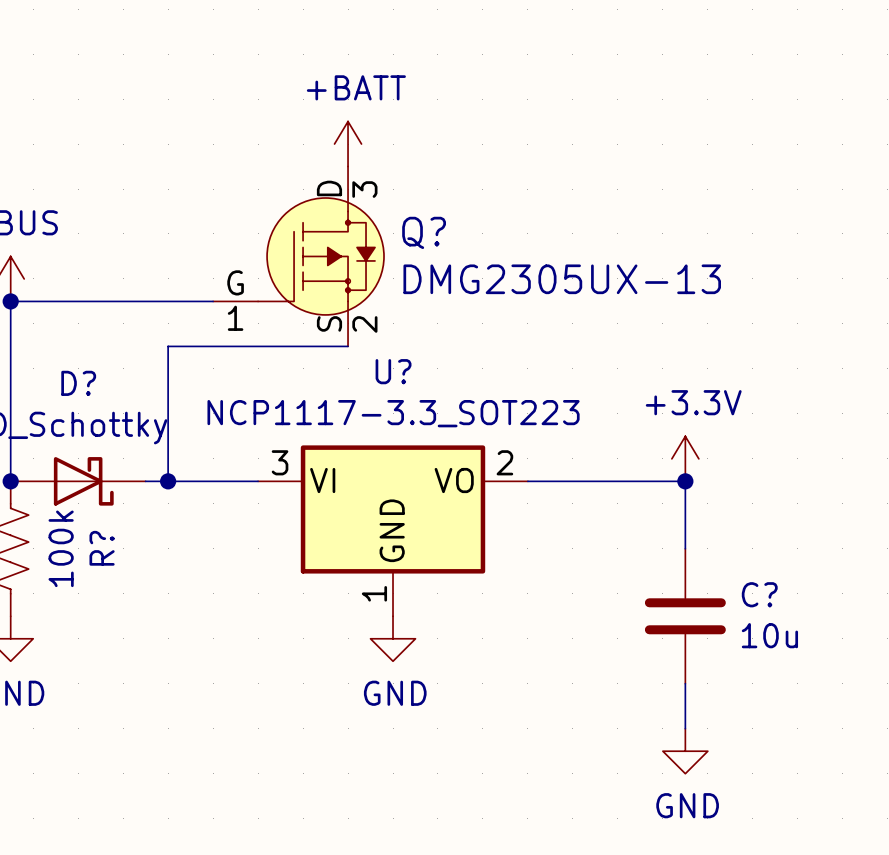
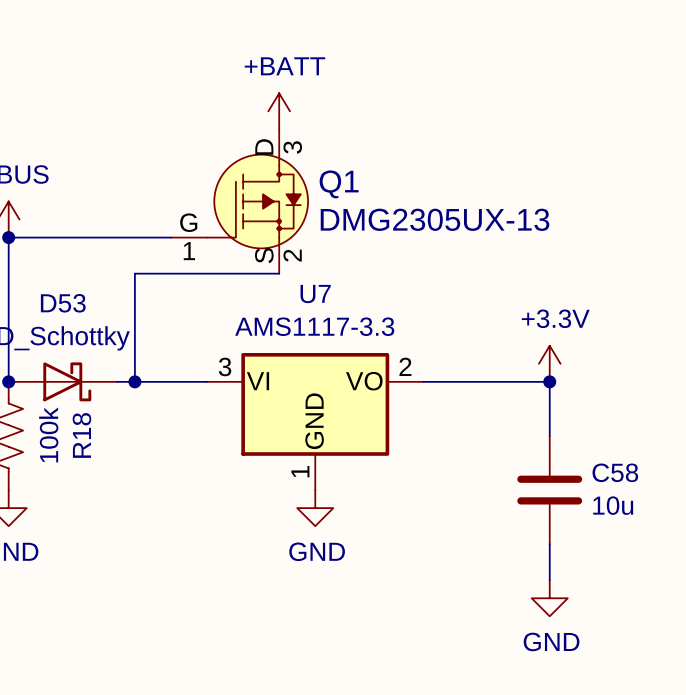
Q? name: Q? (424, 232) -> Q1 (339, 184)
U? name: U? (393, 371) -> U7 (315, 294)
D? name: D? (78, 383) -> D53 (63, 303)
U? value: NCP1117-3.3_SOT223 (393, 413) -> AMS1117-3.3 (314, 326)
R? name: R? (102, 548) -> R18 (81, 435)
C? name: C? (759, 594) -> C58 (615, 472)

